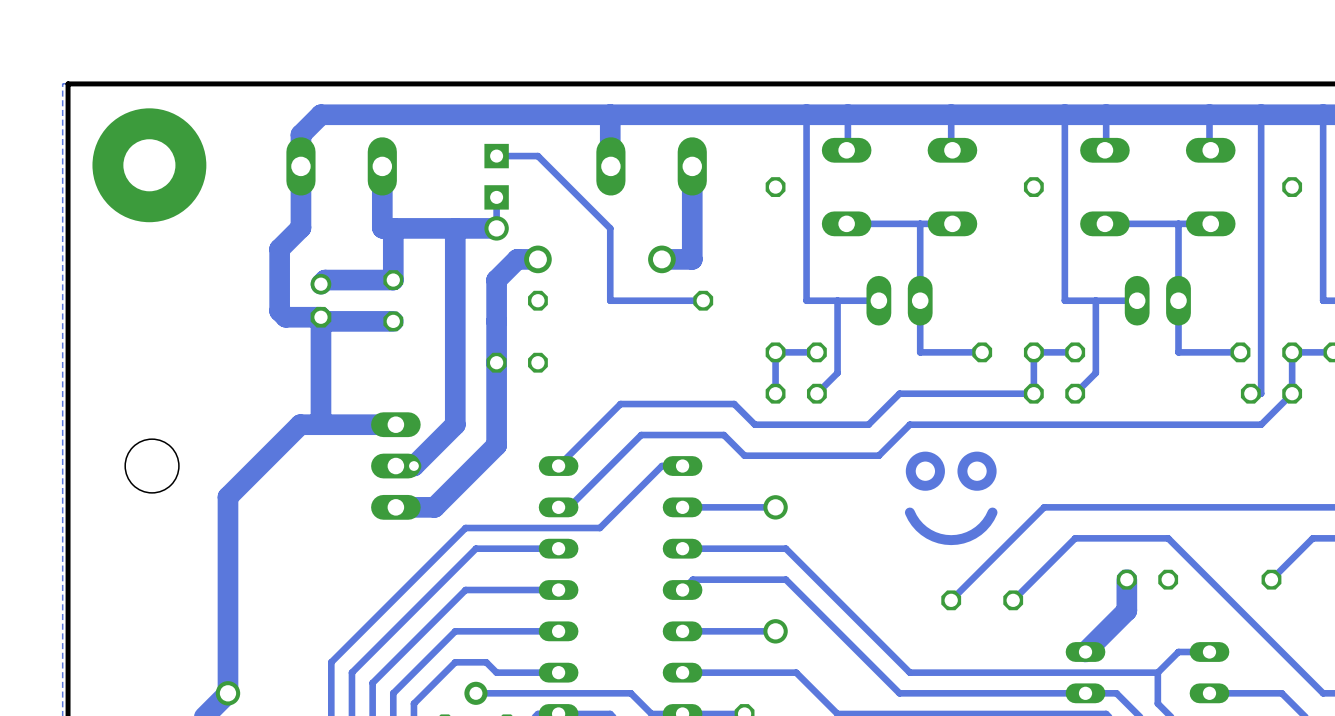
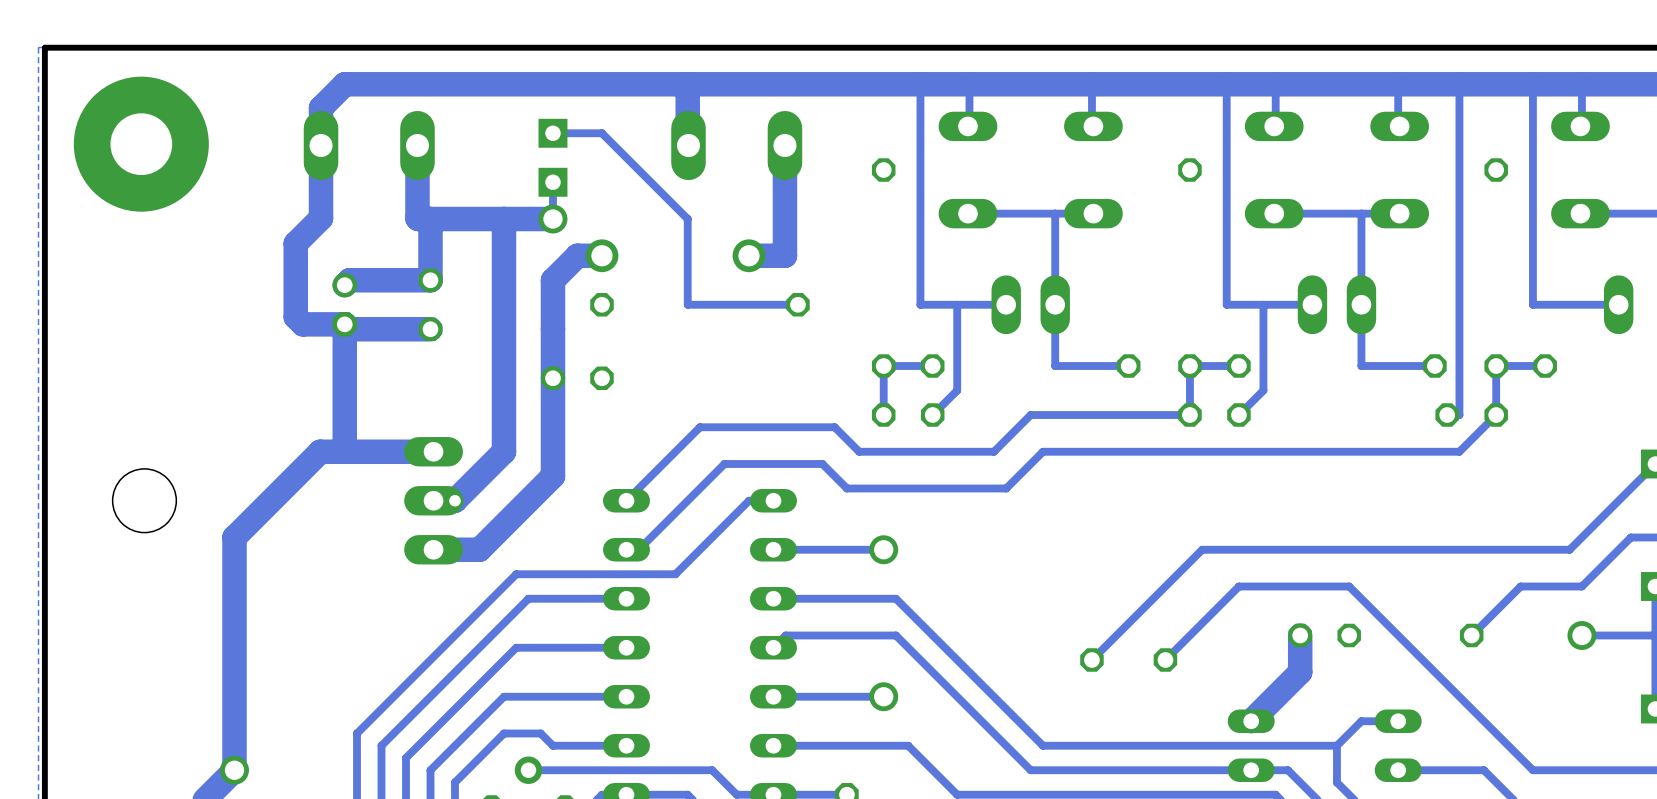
drawing: [905, 451, 997, 491] -> none
track: (992, 512) (986, 522) (978, 530) (968, 536) (951, 540) (934, 536) (923, 530) (915, 522) (909, 512) -> none

